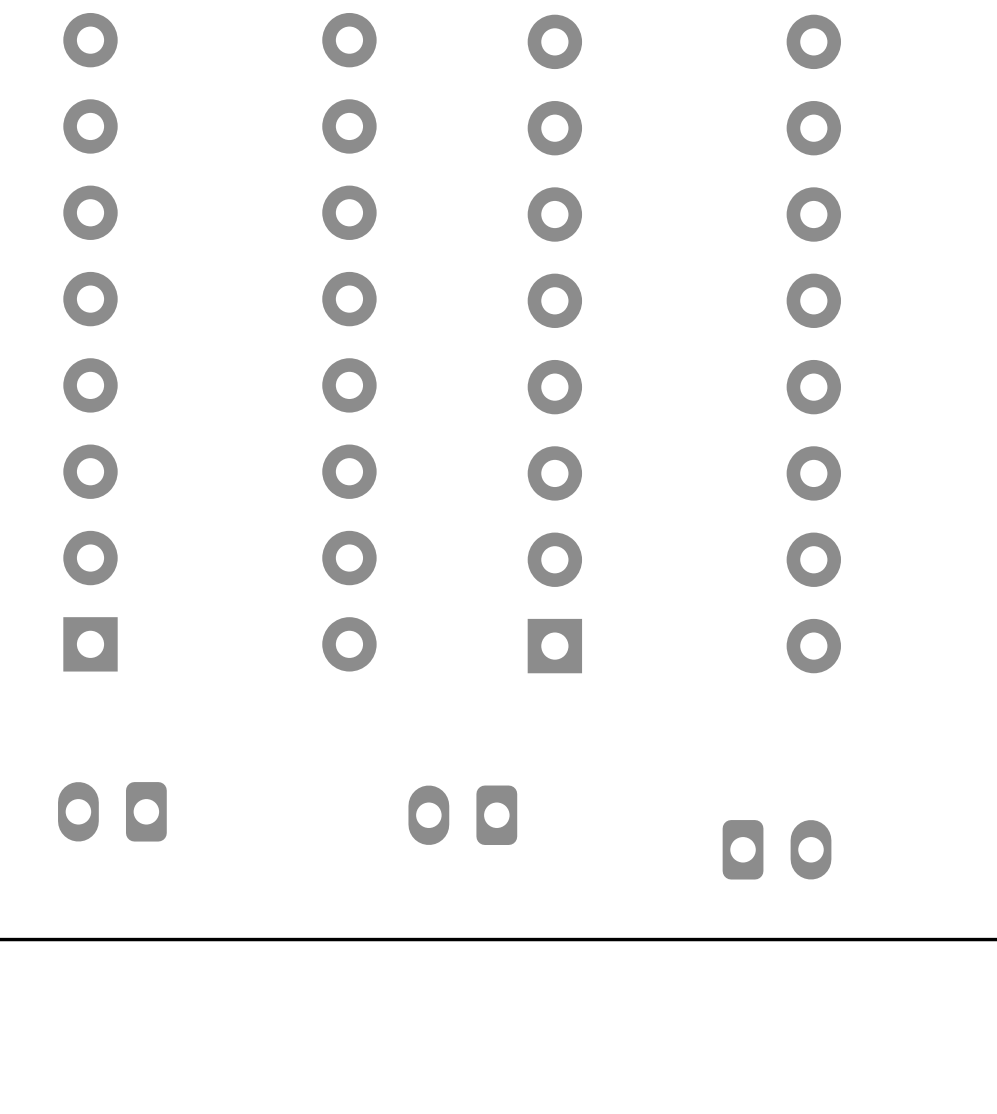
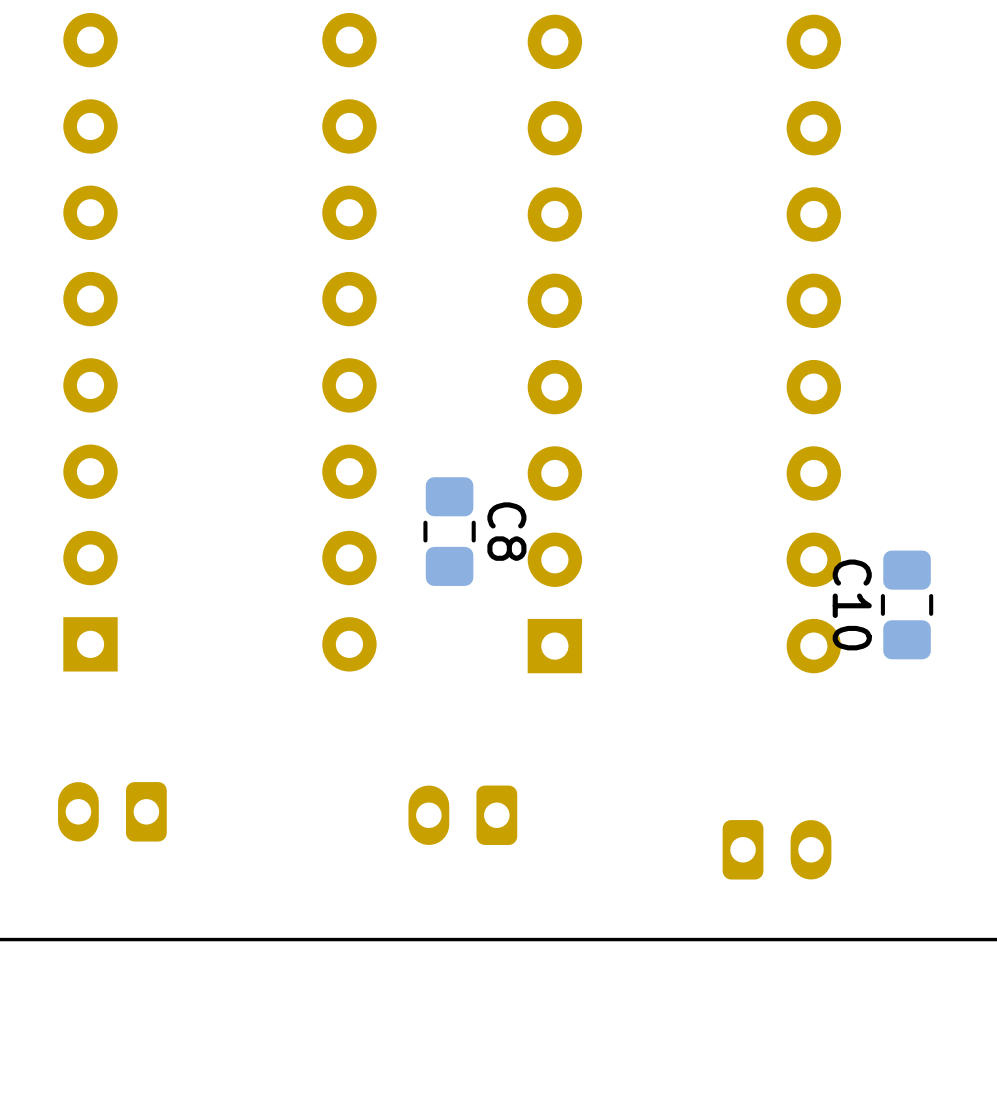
C8: none -> (449, 531)
C10: none -> (907, 604)

